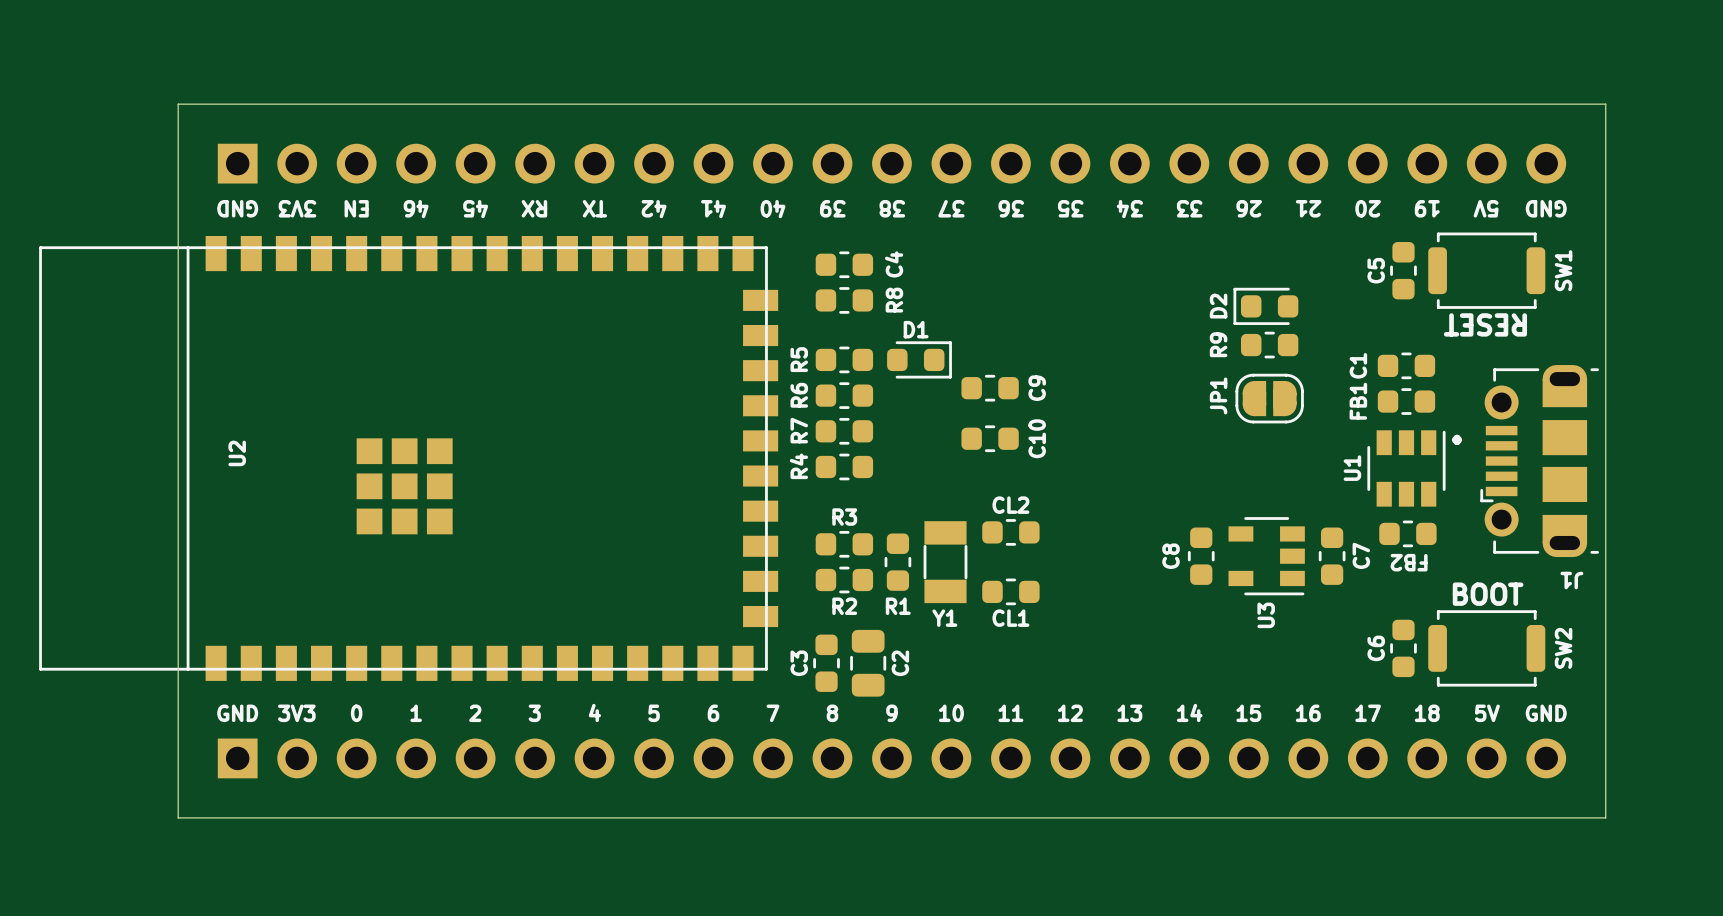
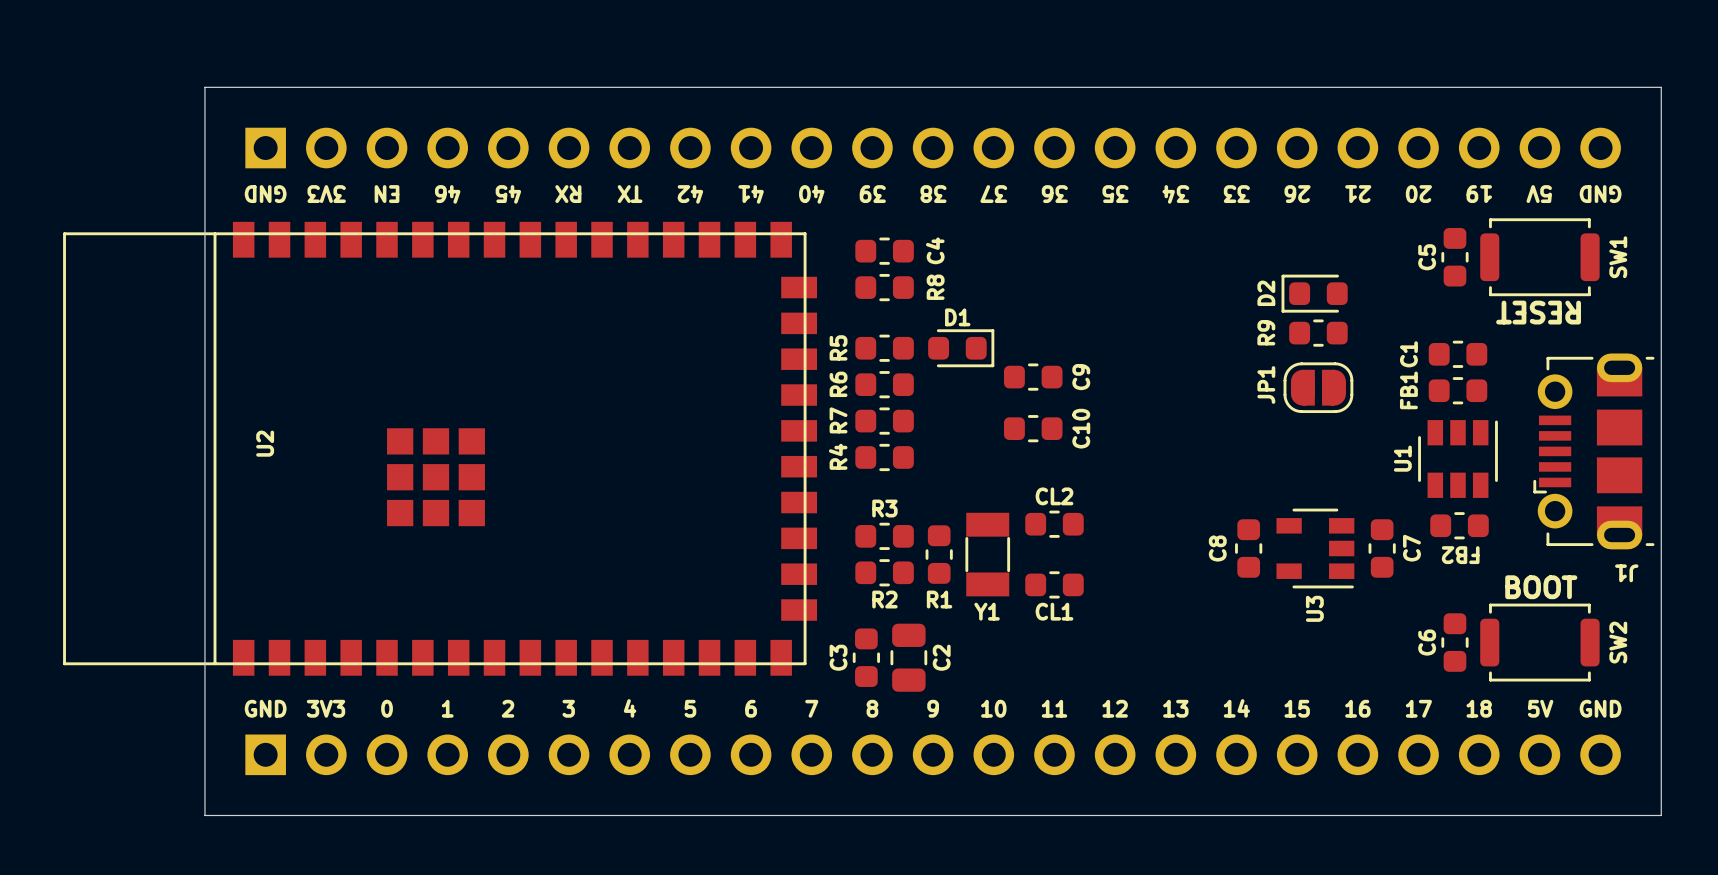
text: . (1457, 439) -> none

